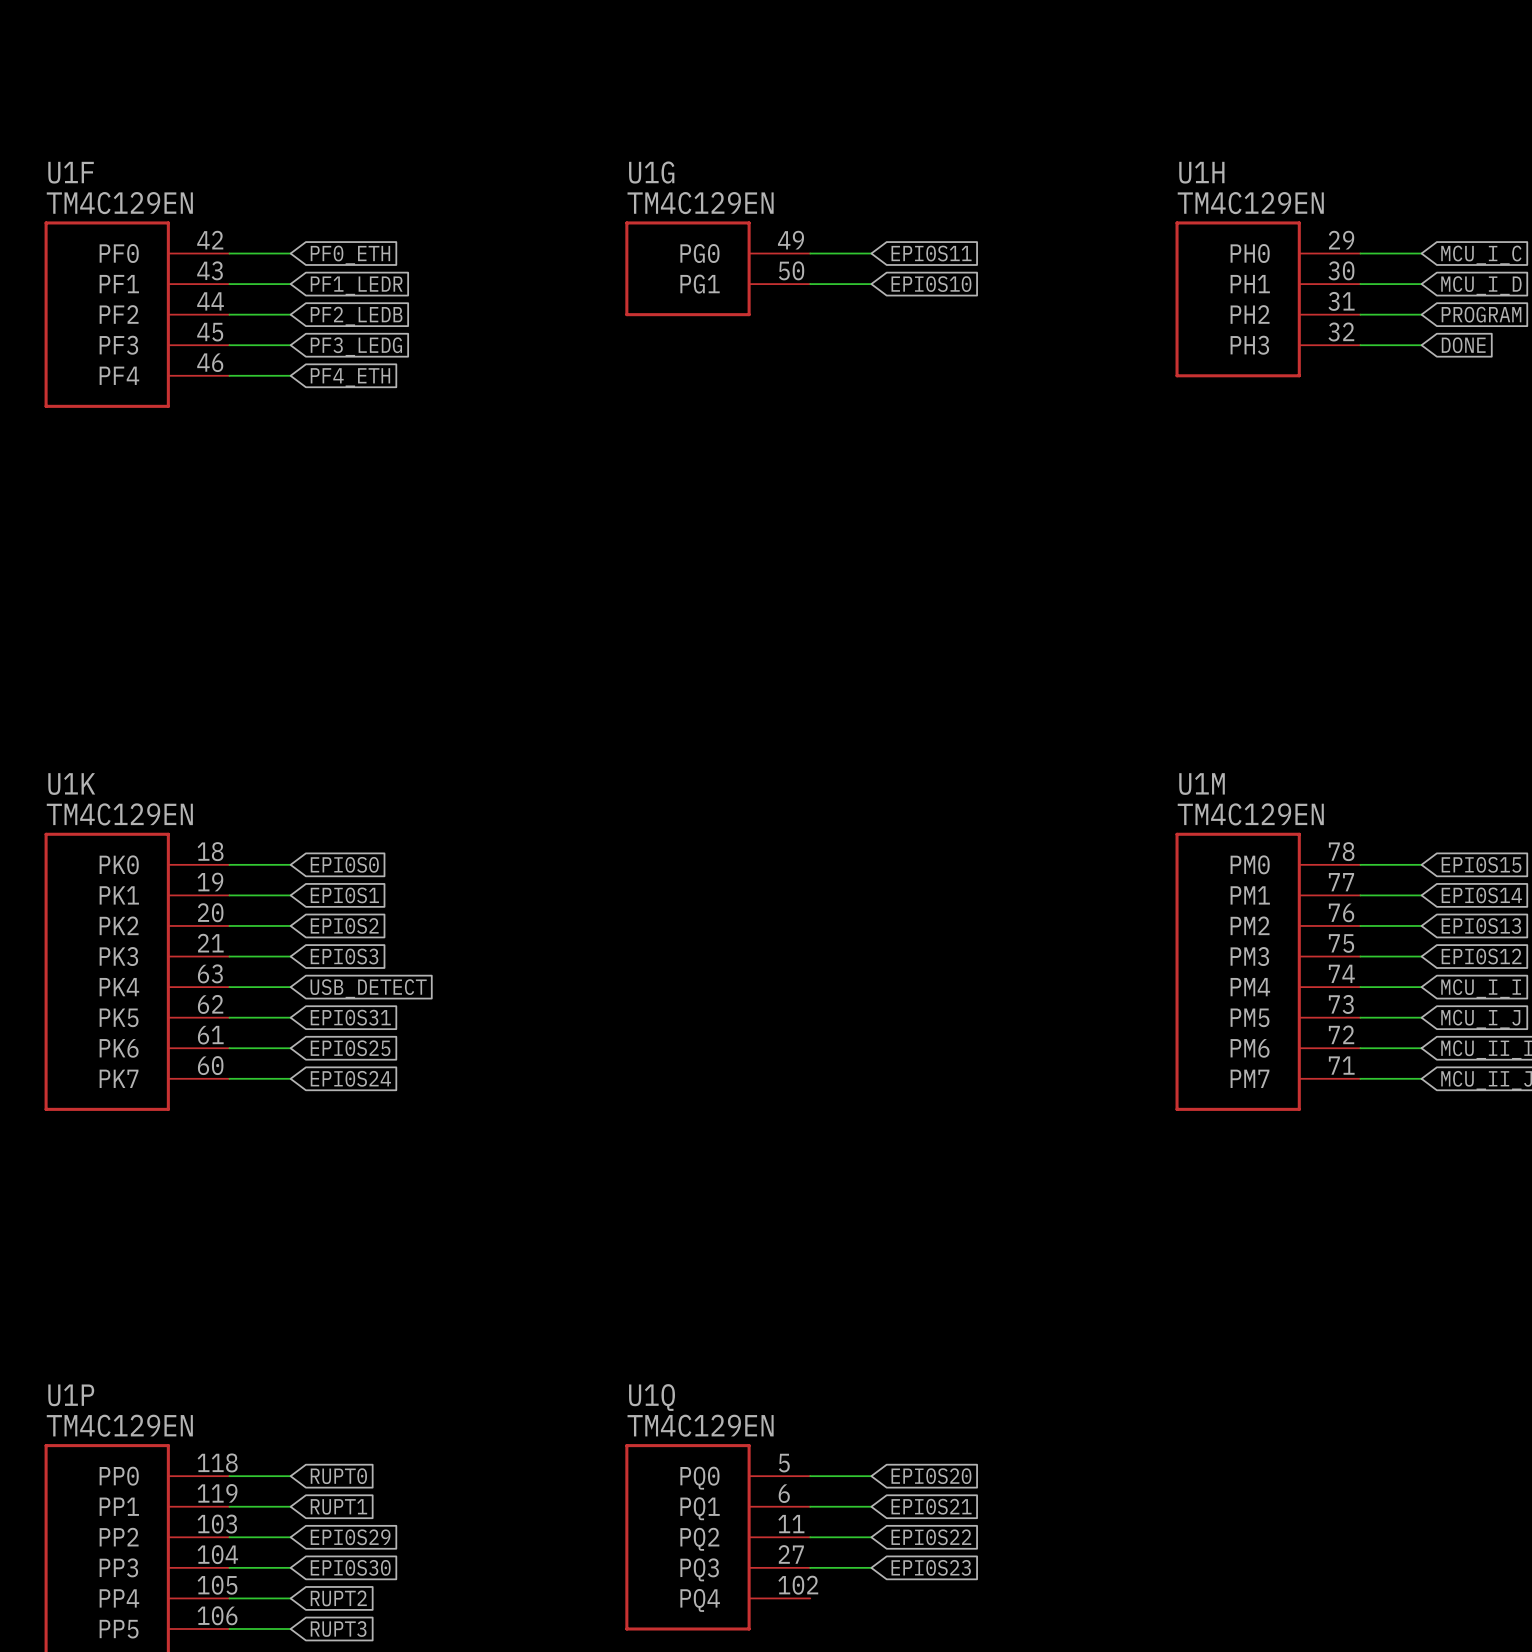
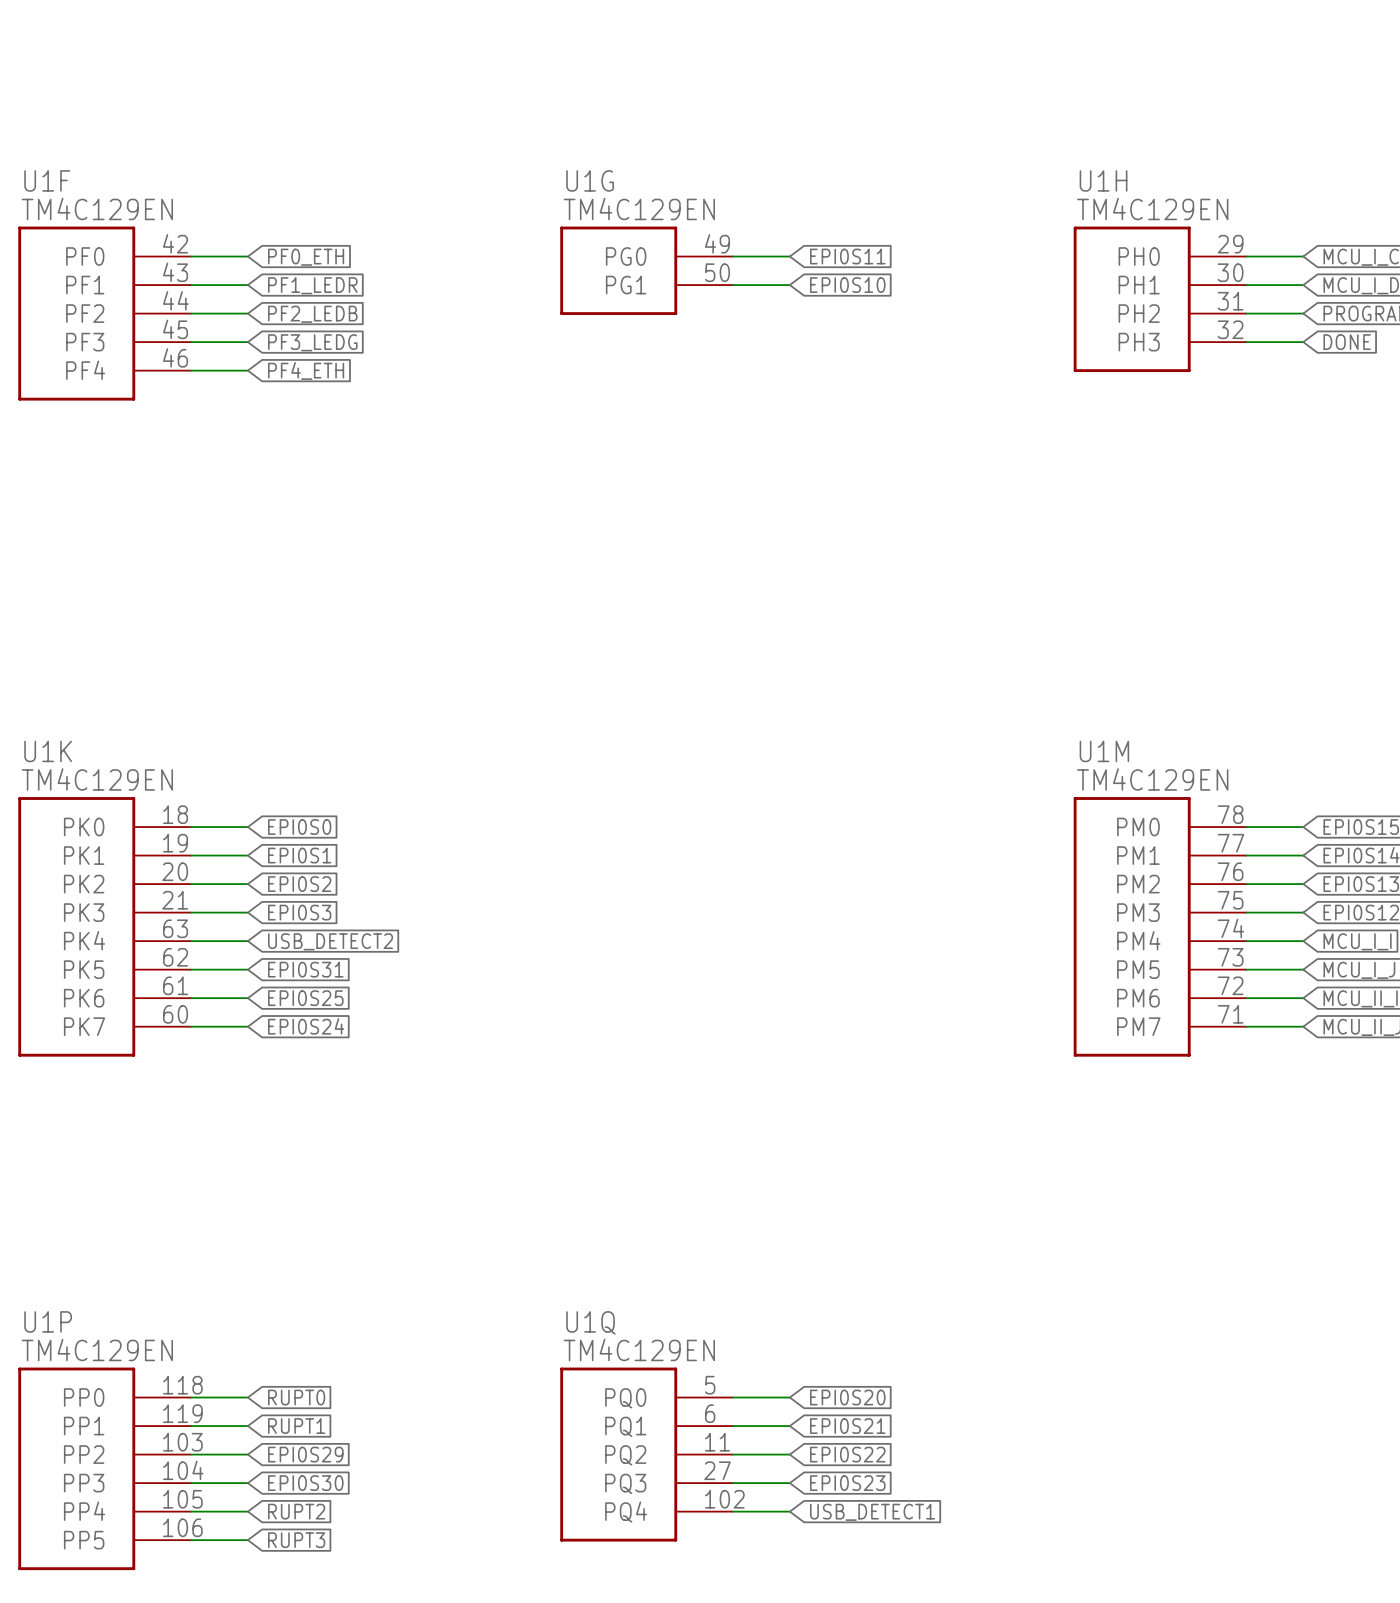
global label: USB_DETECT (368, 988) -> USB_DETECT2 (330, 941)
wire: none -> (732, 1511) (789, 1511)
global label: none -> USB_DETECT1 (872, 1512)

